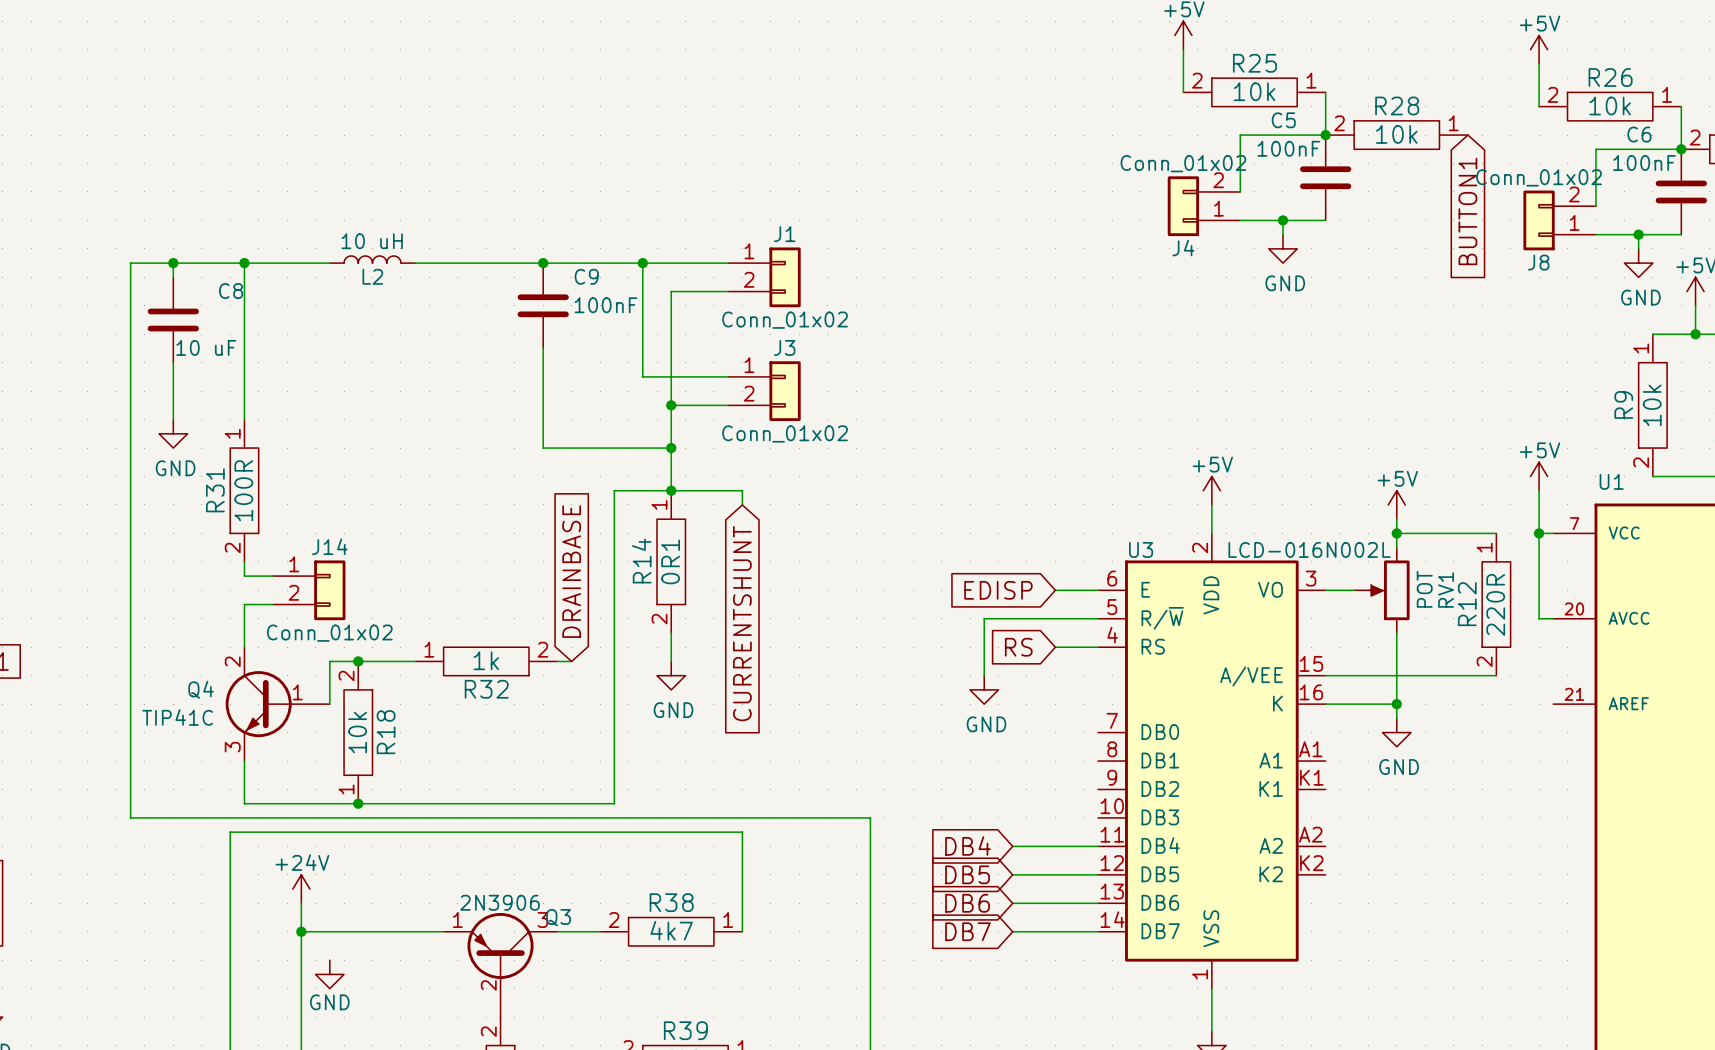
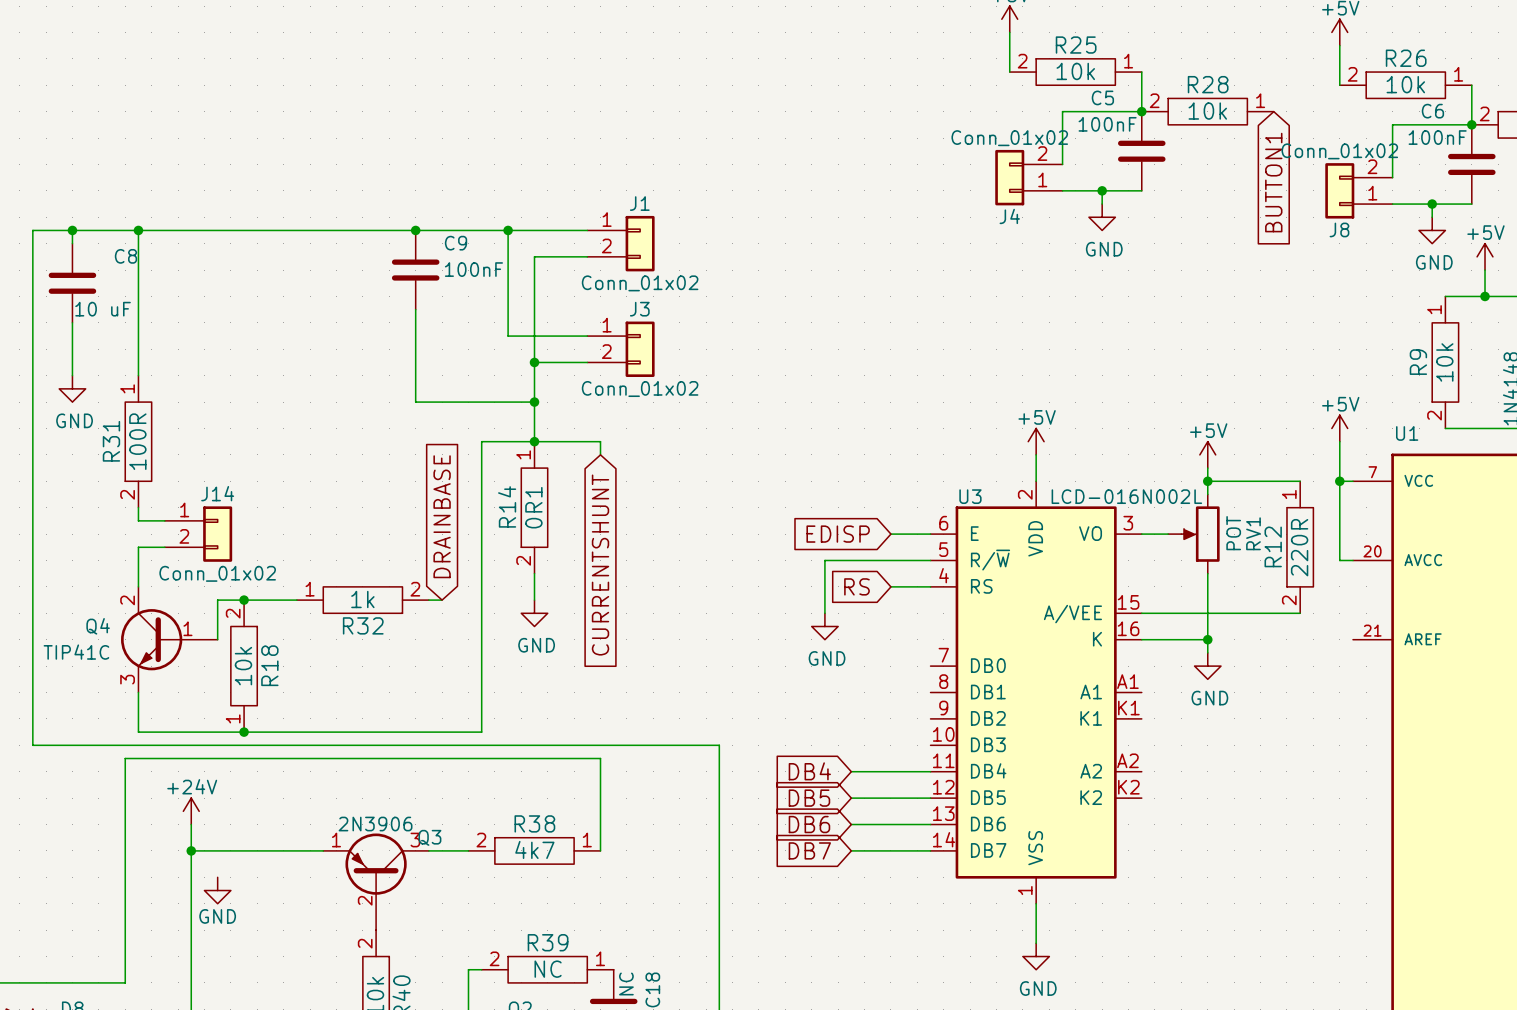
L2: 10 uH (372, 259) -> none
wire: none -> (217, 230) (296, 230)

